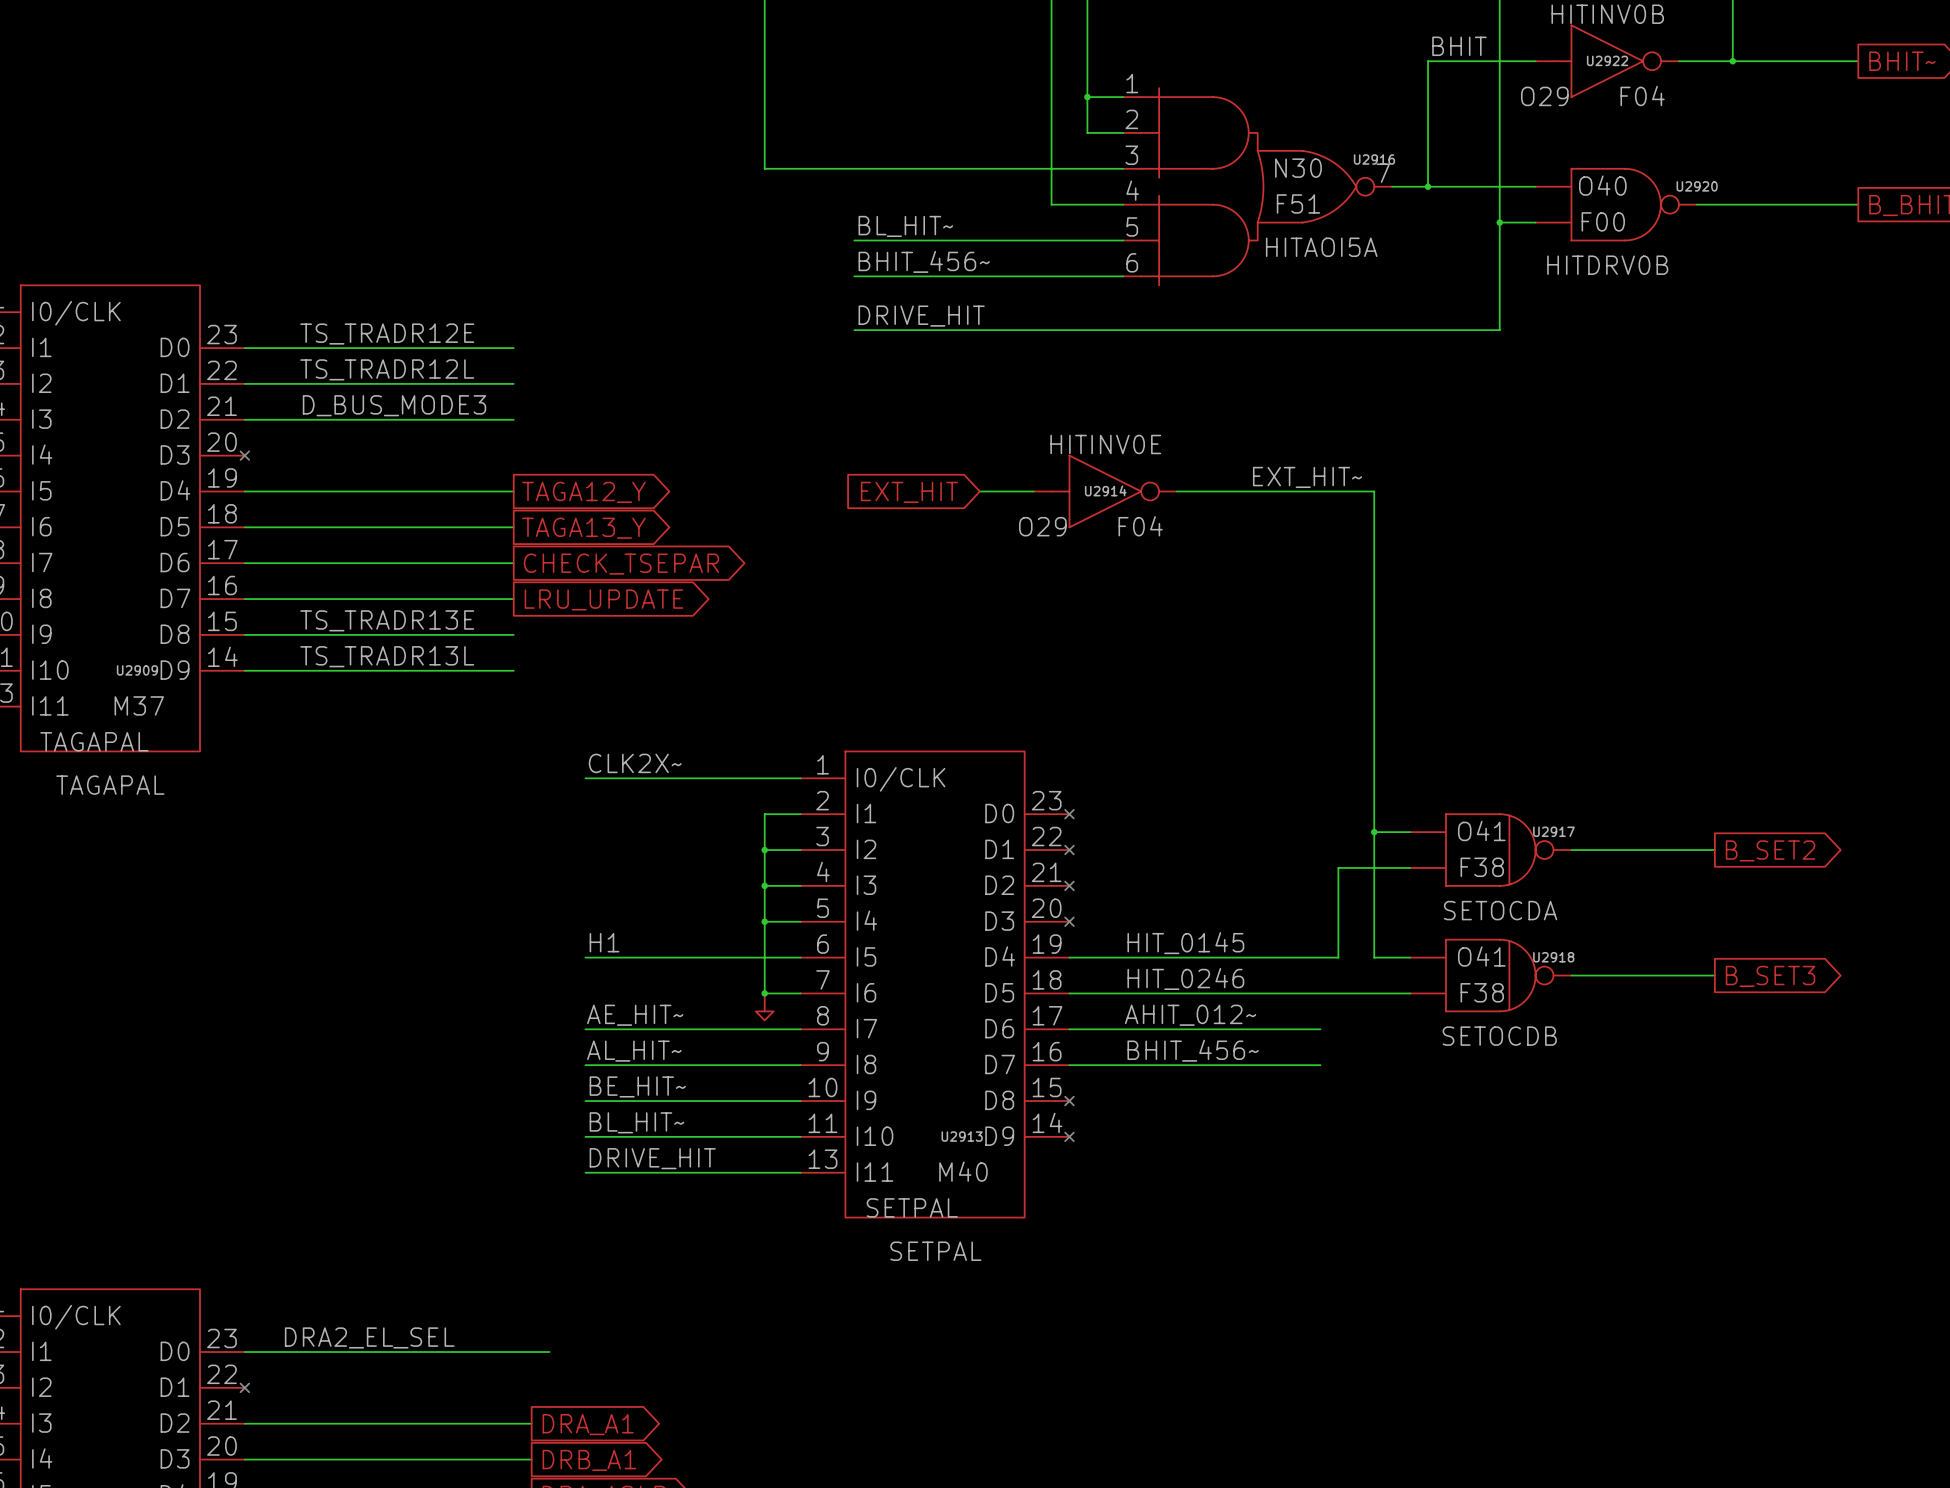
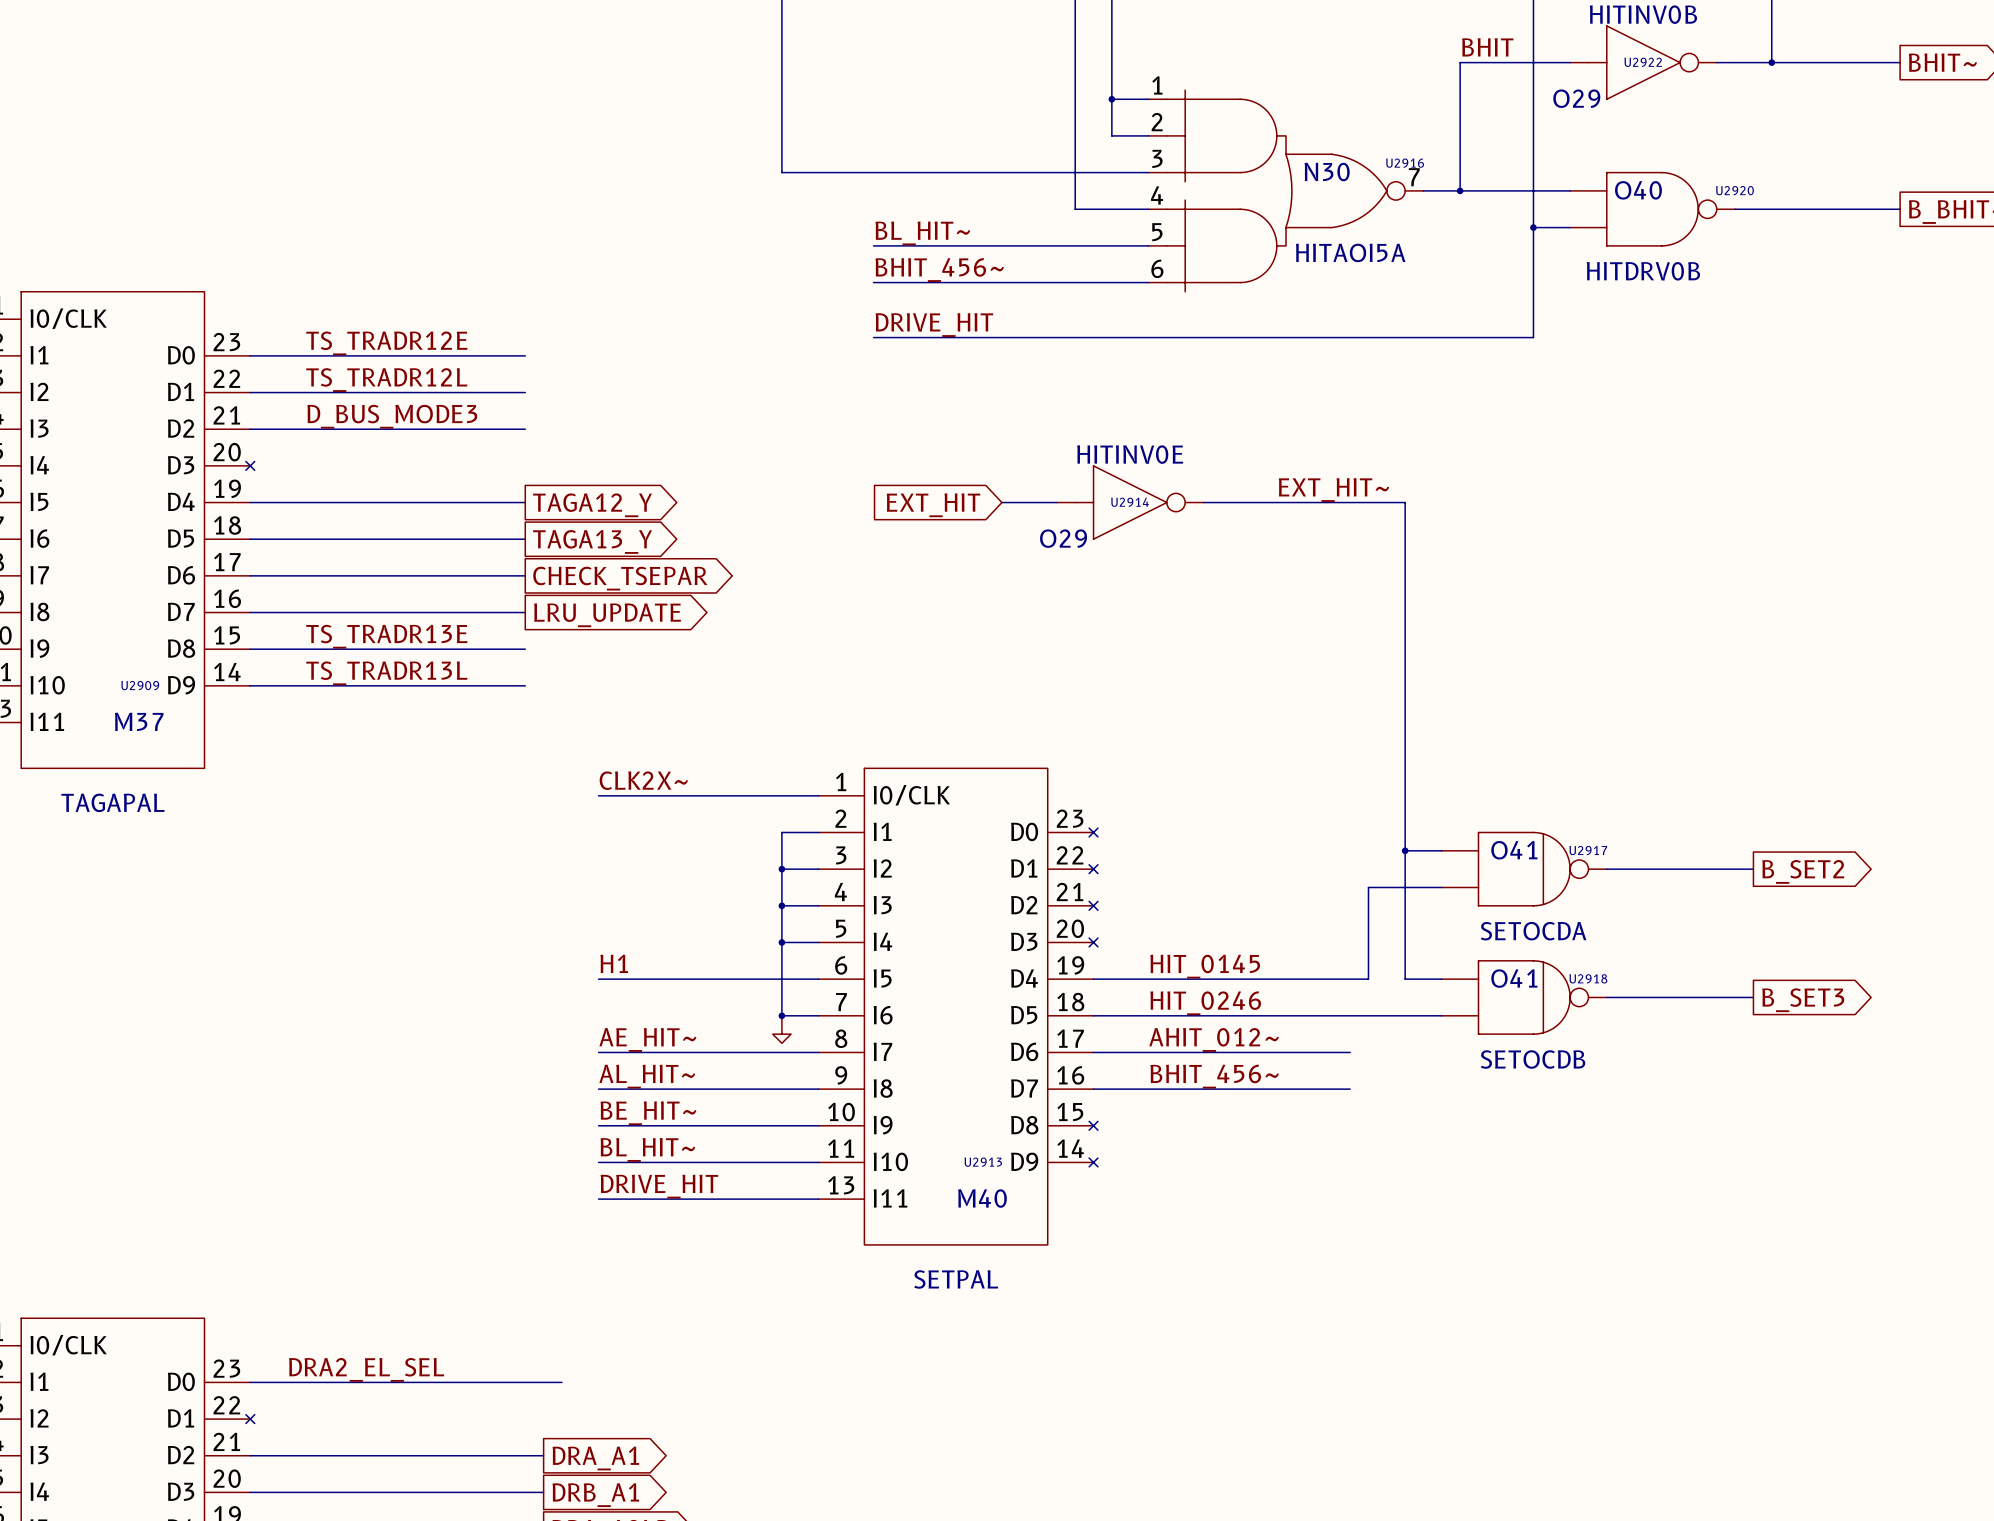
U2922 value: F04 (1642, 95) -> none
U2916 value: F51 (1298, 203) -> none
U2920 value: F00 (1603, 221) -> none
U2914 value: F04 (1140, 526) -> none
U2909 value: TAGAPAL (94, 741) -> none
U2917 value: F38 (1482, 867) -> none
U2918 value: F38 (1482, 992) -> none
U2913 value: SETPAL (912, 1207) -> none

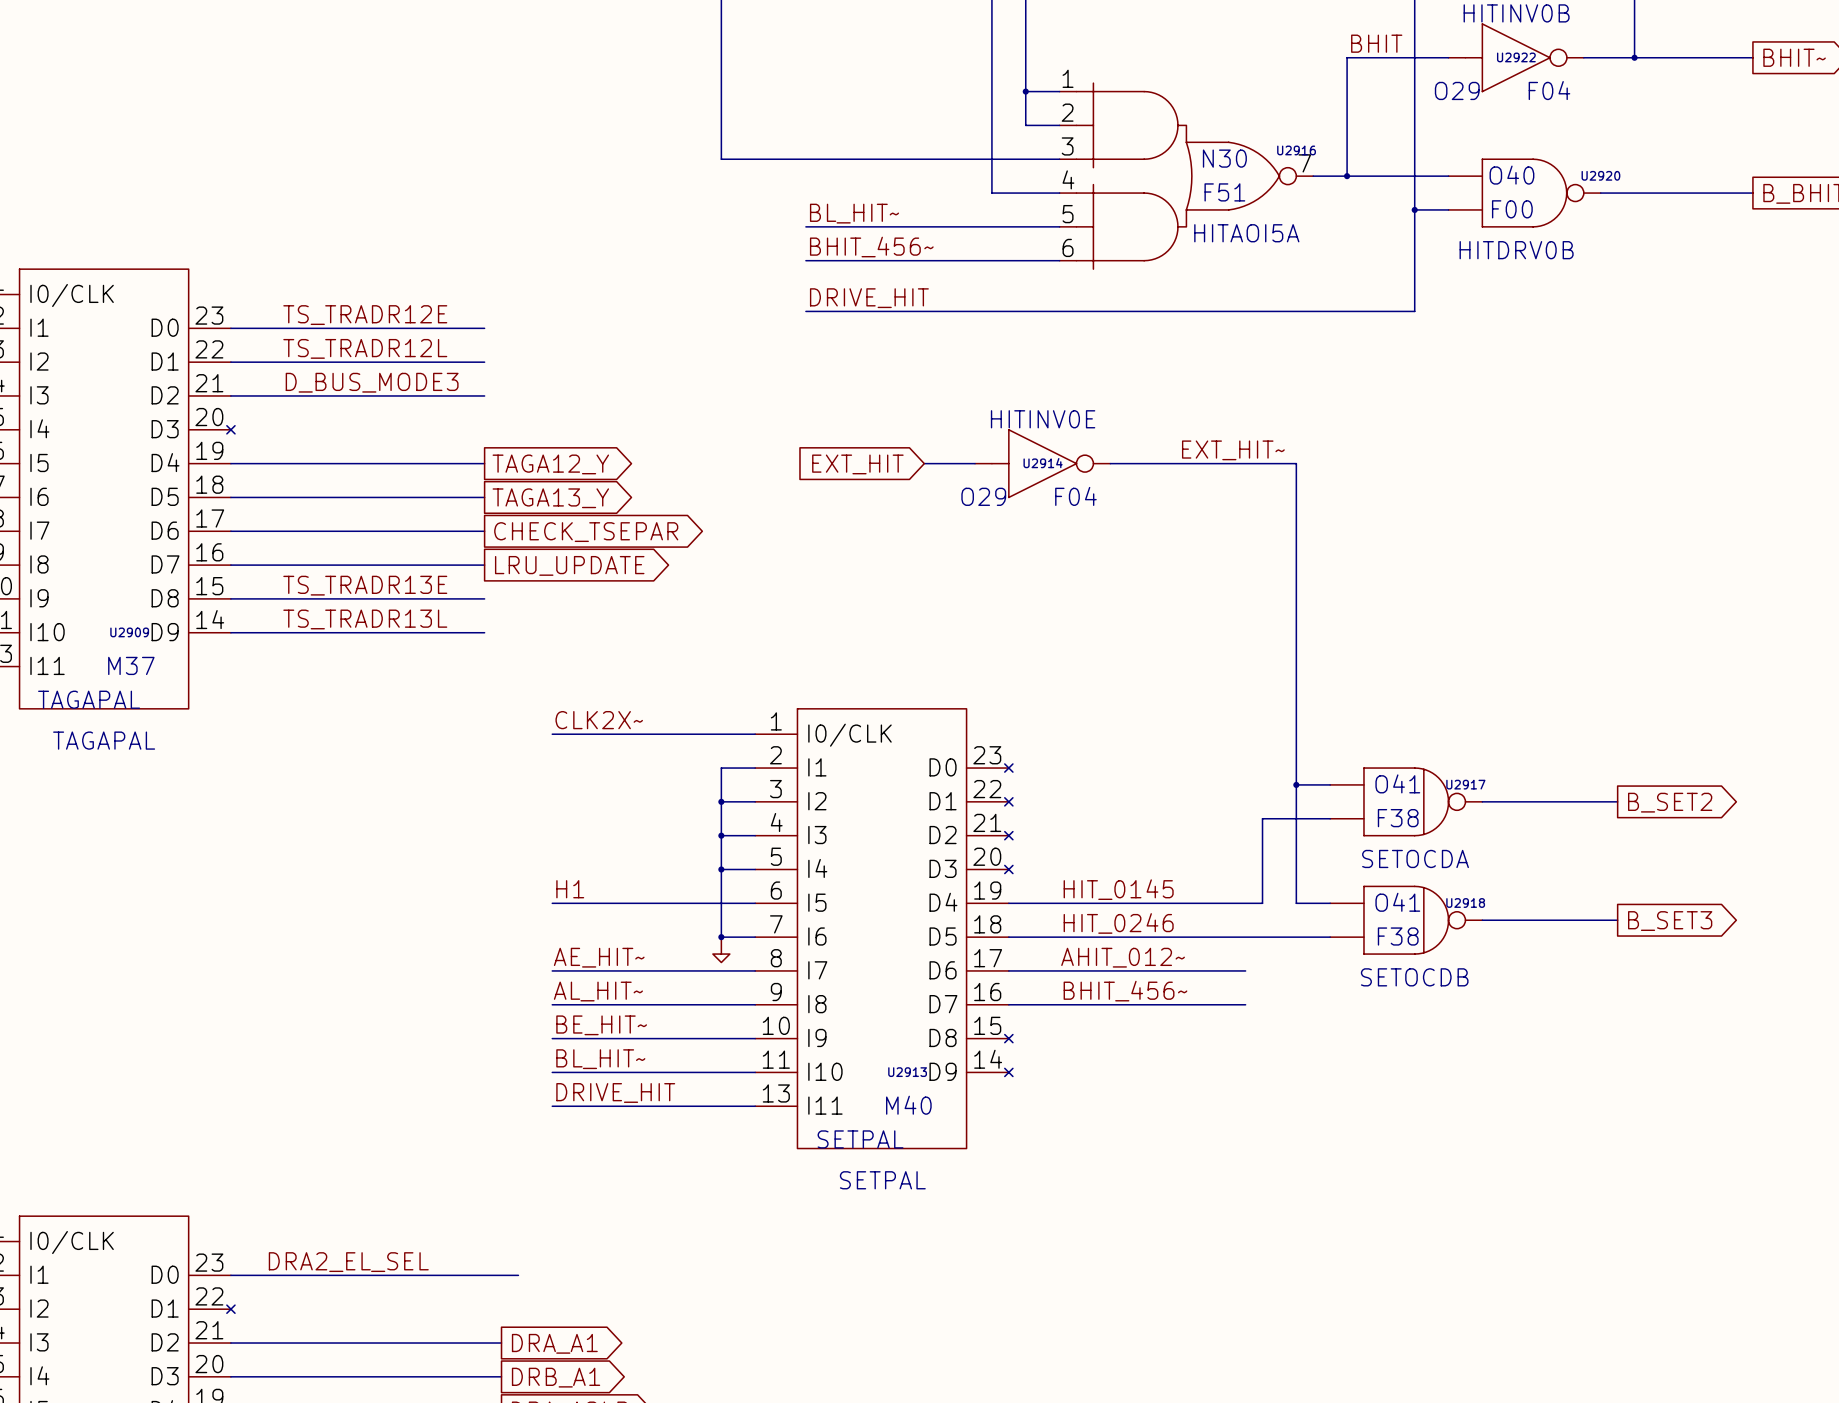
U2922 value: none -> F04 (1549, 90)
U2916 value: none -> F51 (1224, 192)
U2920 value: none -> F00 (1512, 209)
U2914 value: none -> F04 (1075, 496)
U2909 value: none -> TAGAPAL (89, 699)
U2917 value: none -> F38 (1398, 818)
U2918 value: none -> F38 (1398, 936)
U2913 value: none -> SETPAL (860, 1139)

